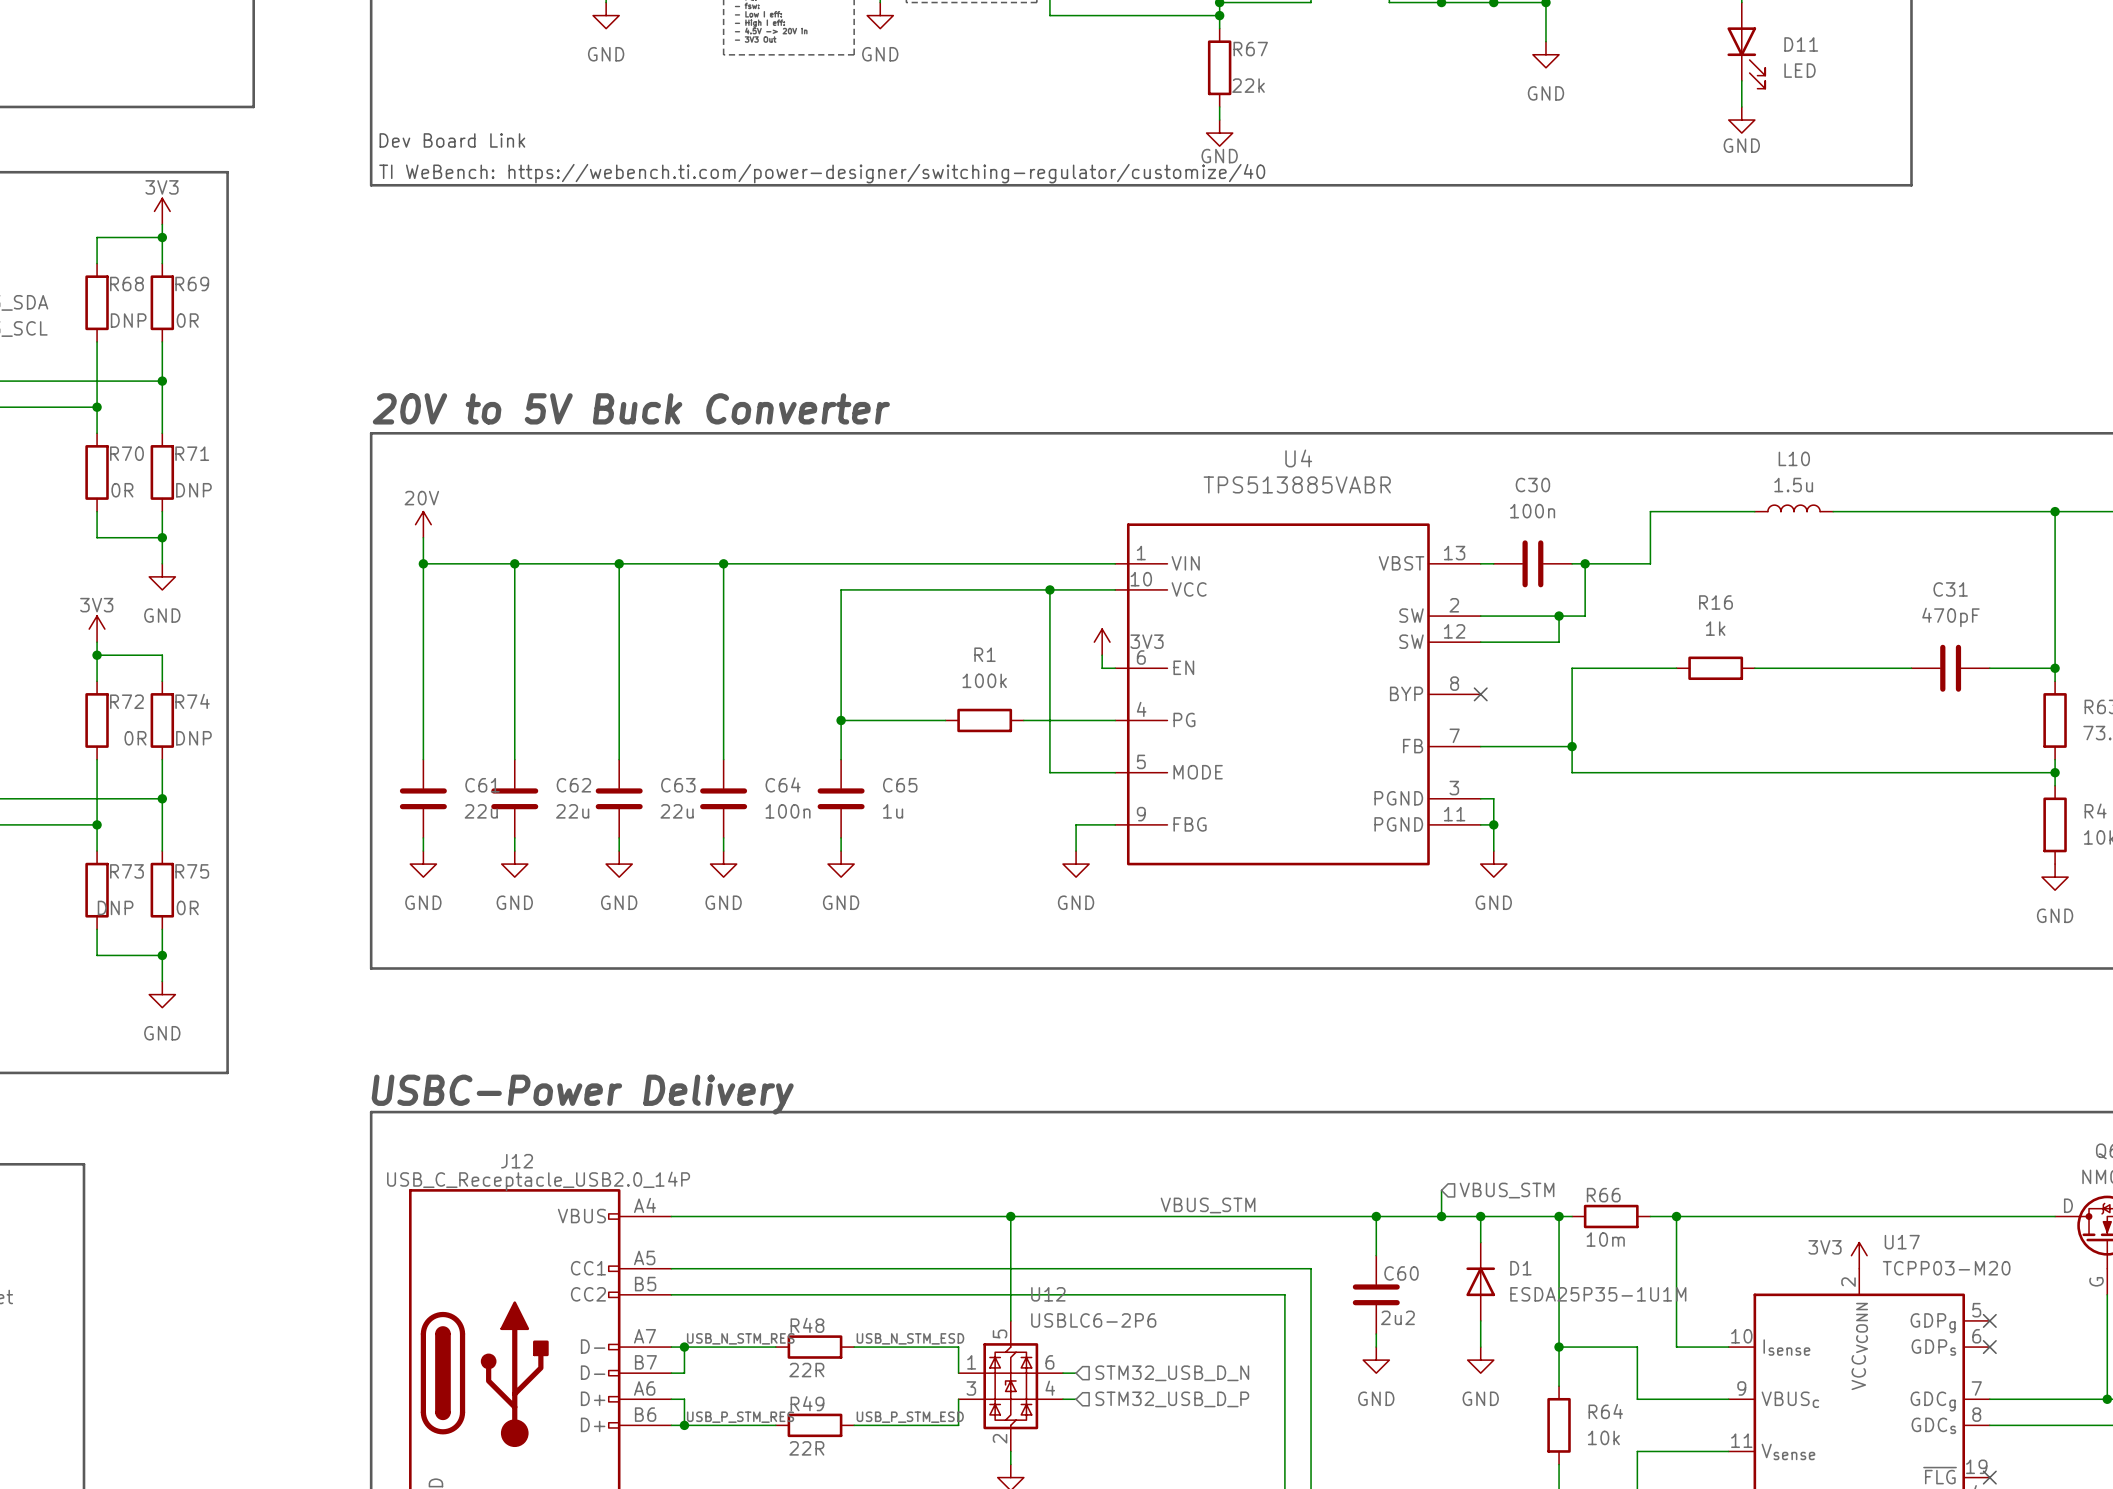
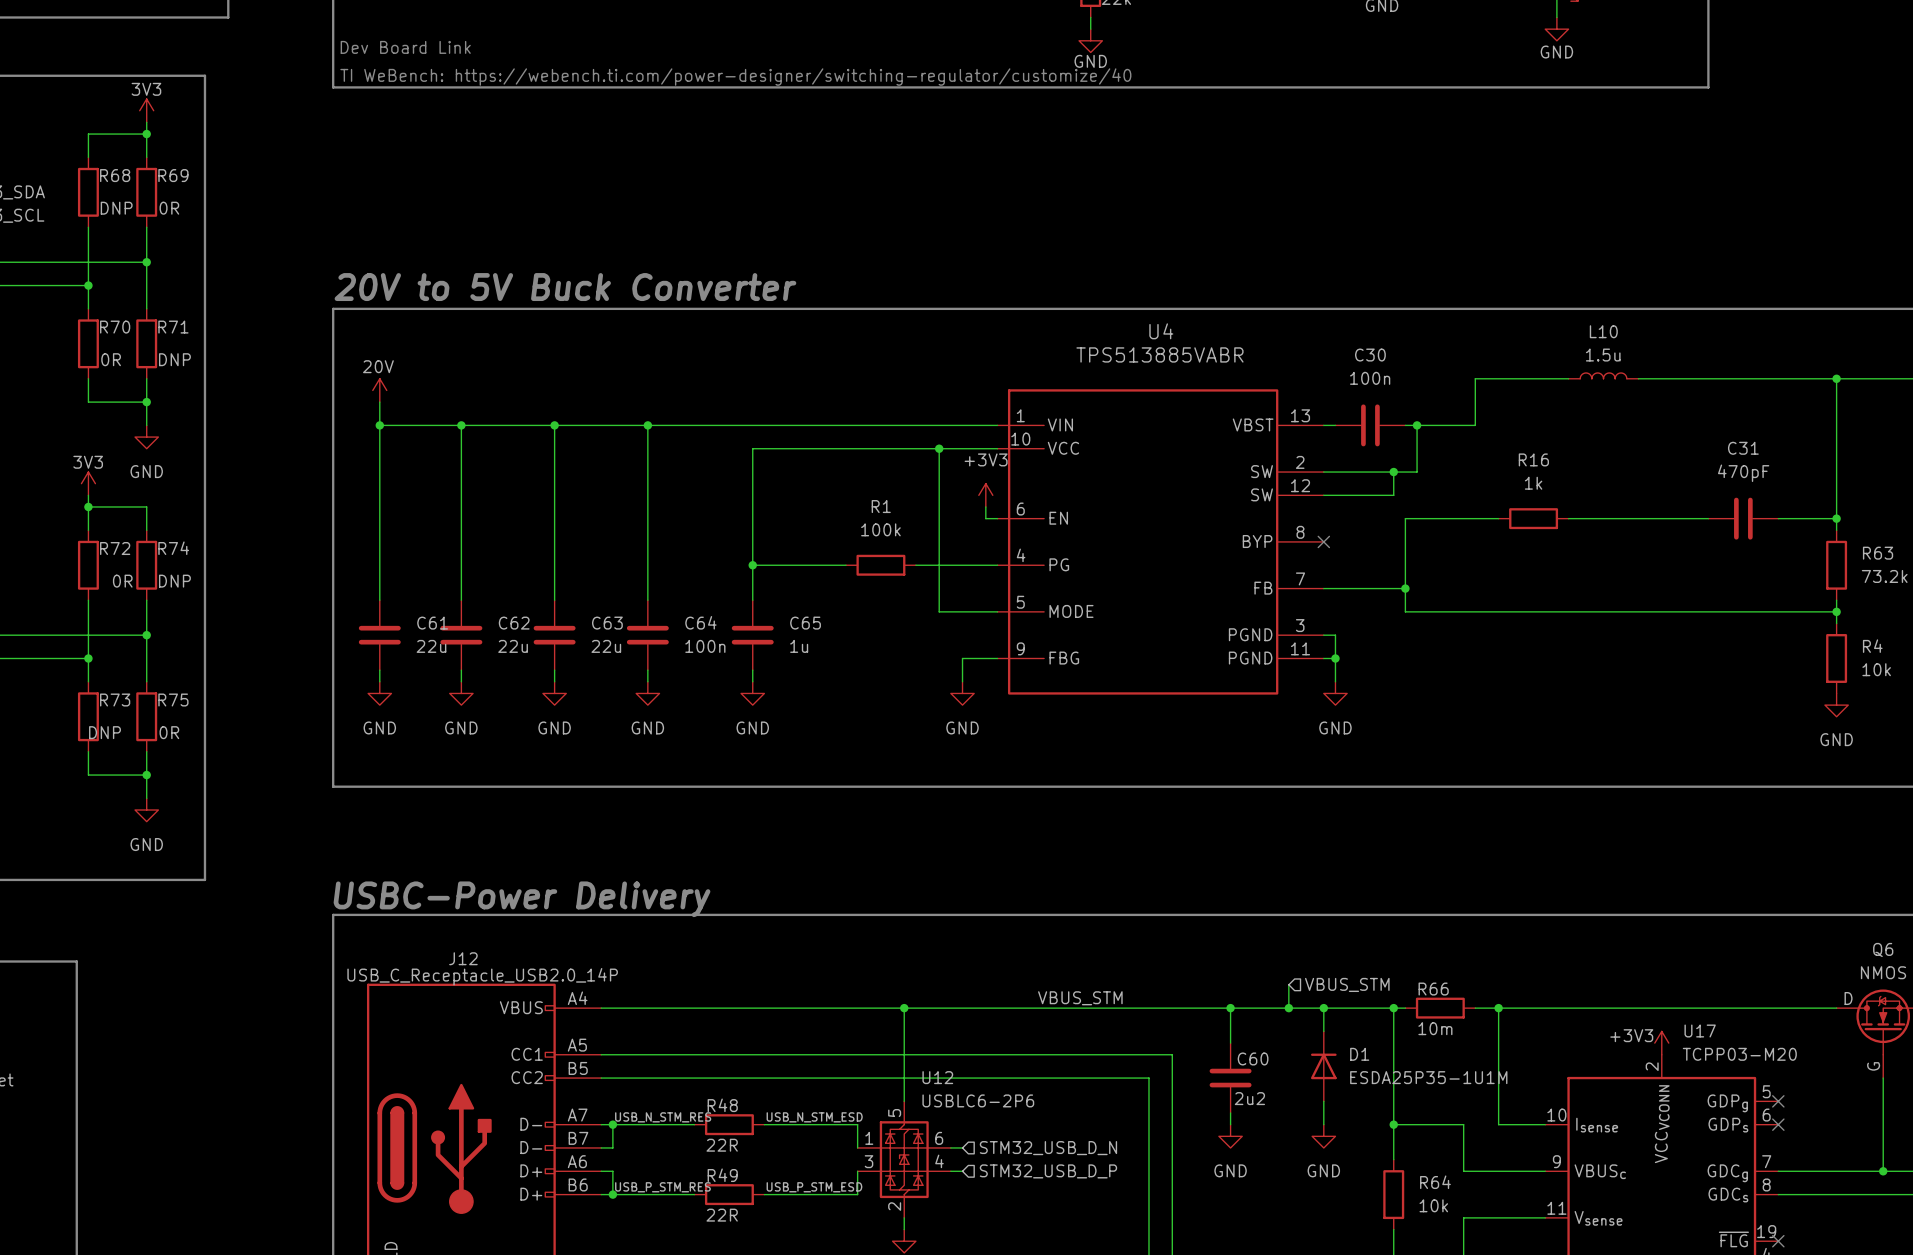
power symbol: 3V3 (1102, 642) -> +3V3 (985, 495)
power symbol: 3V3 (1859, 1255) -> +3V3 (1661, 1043)

